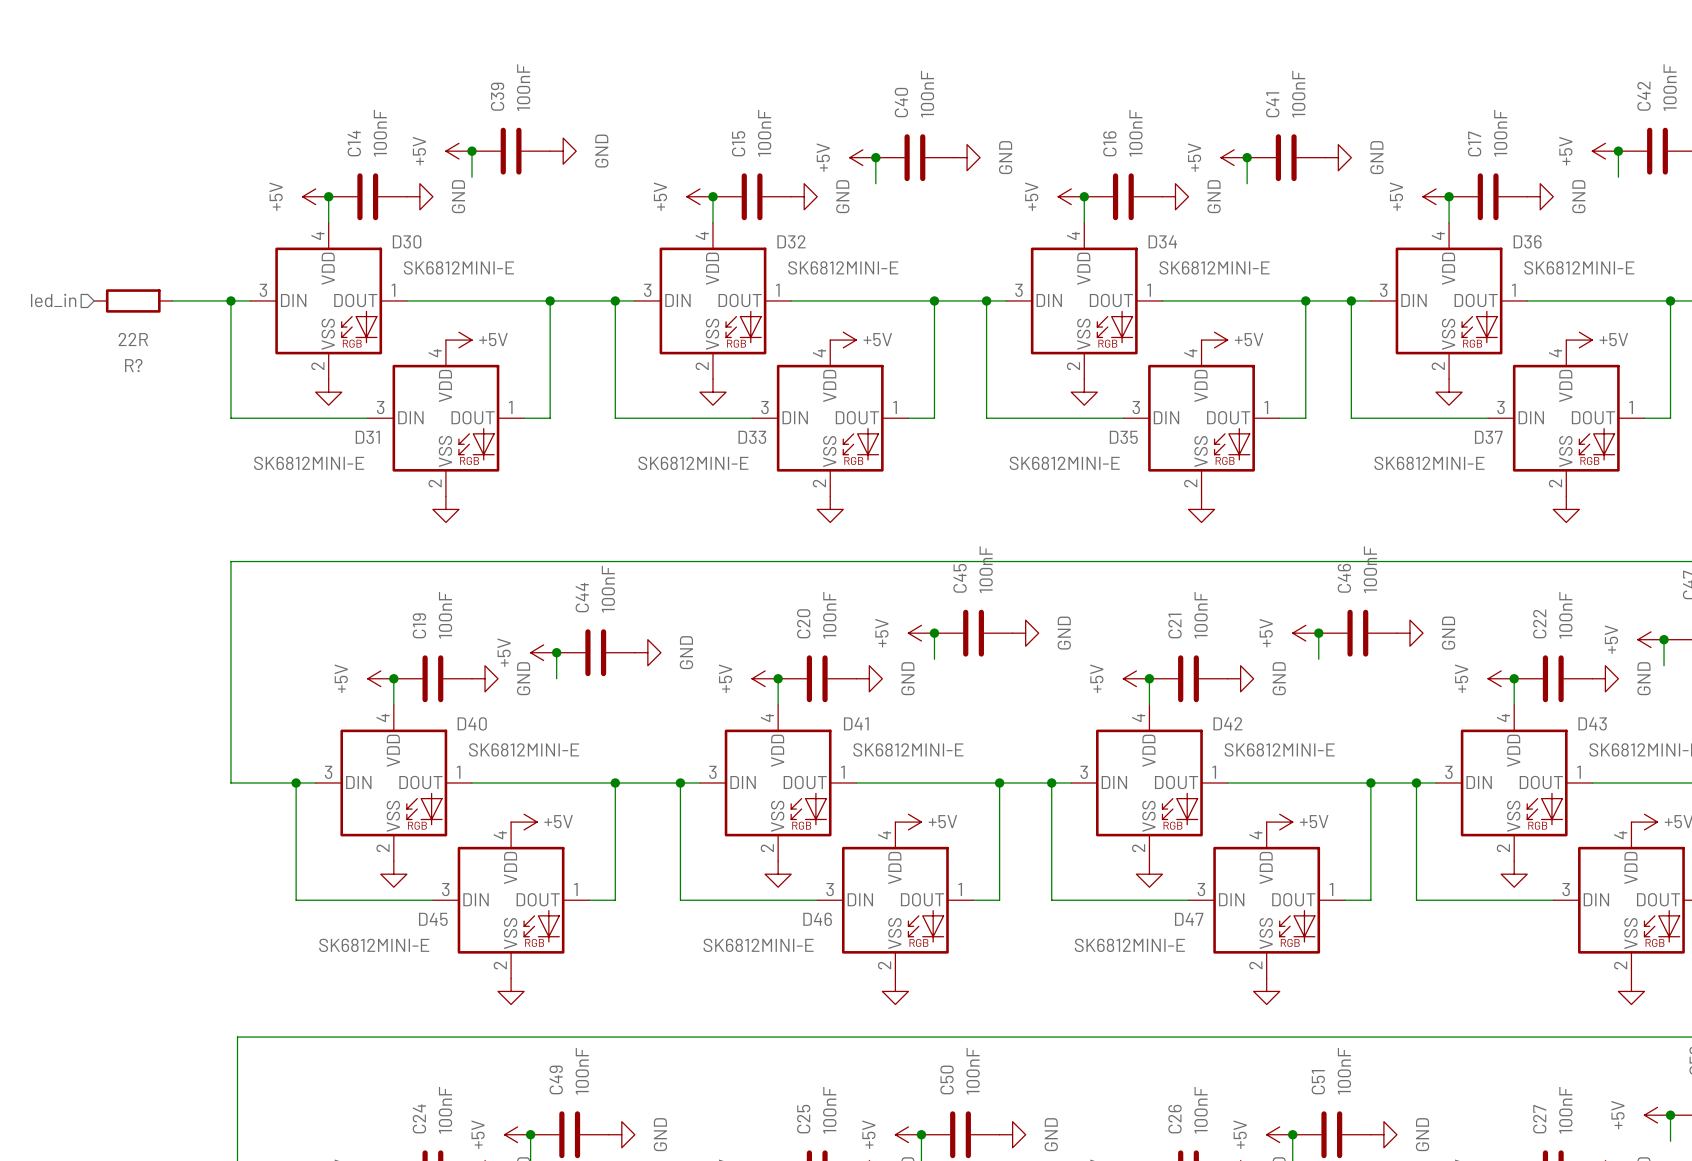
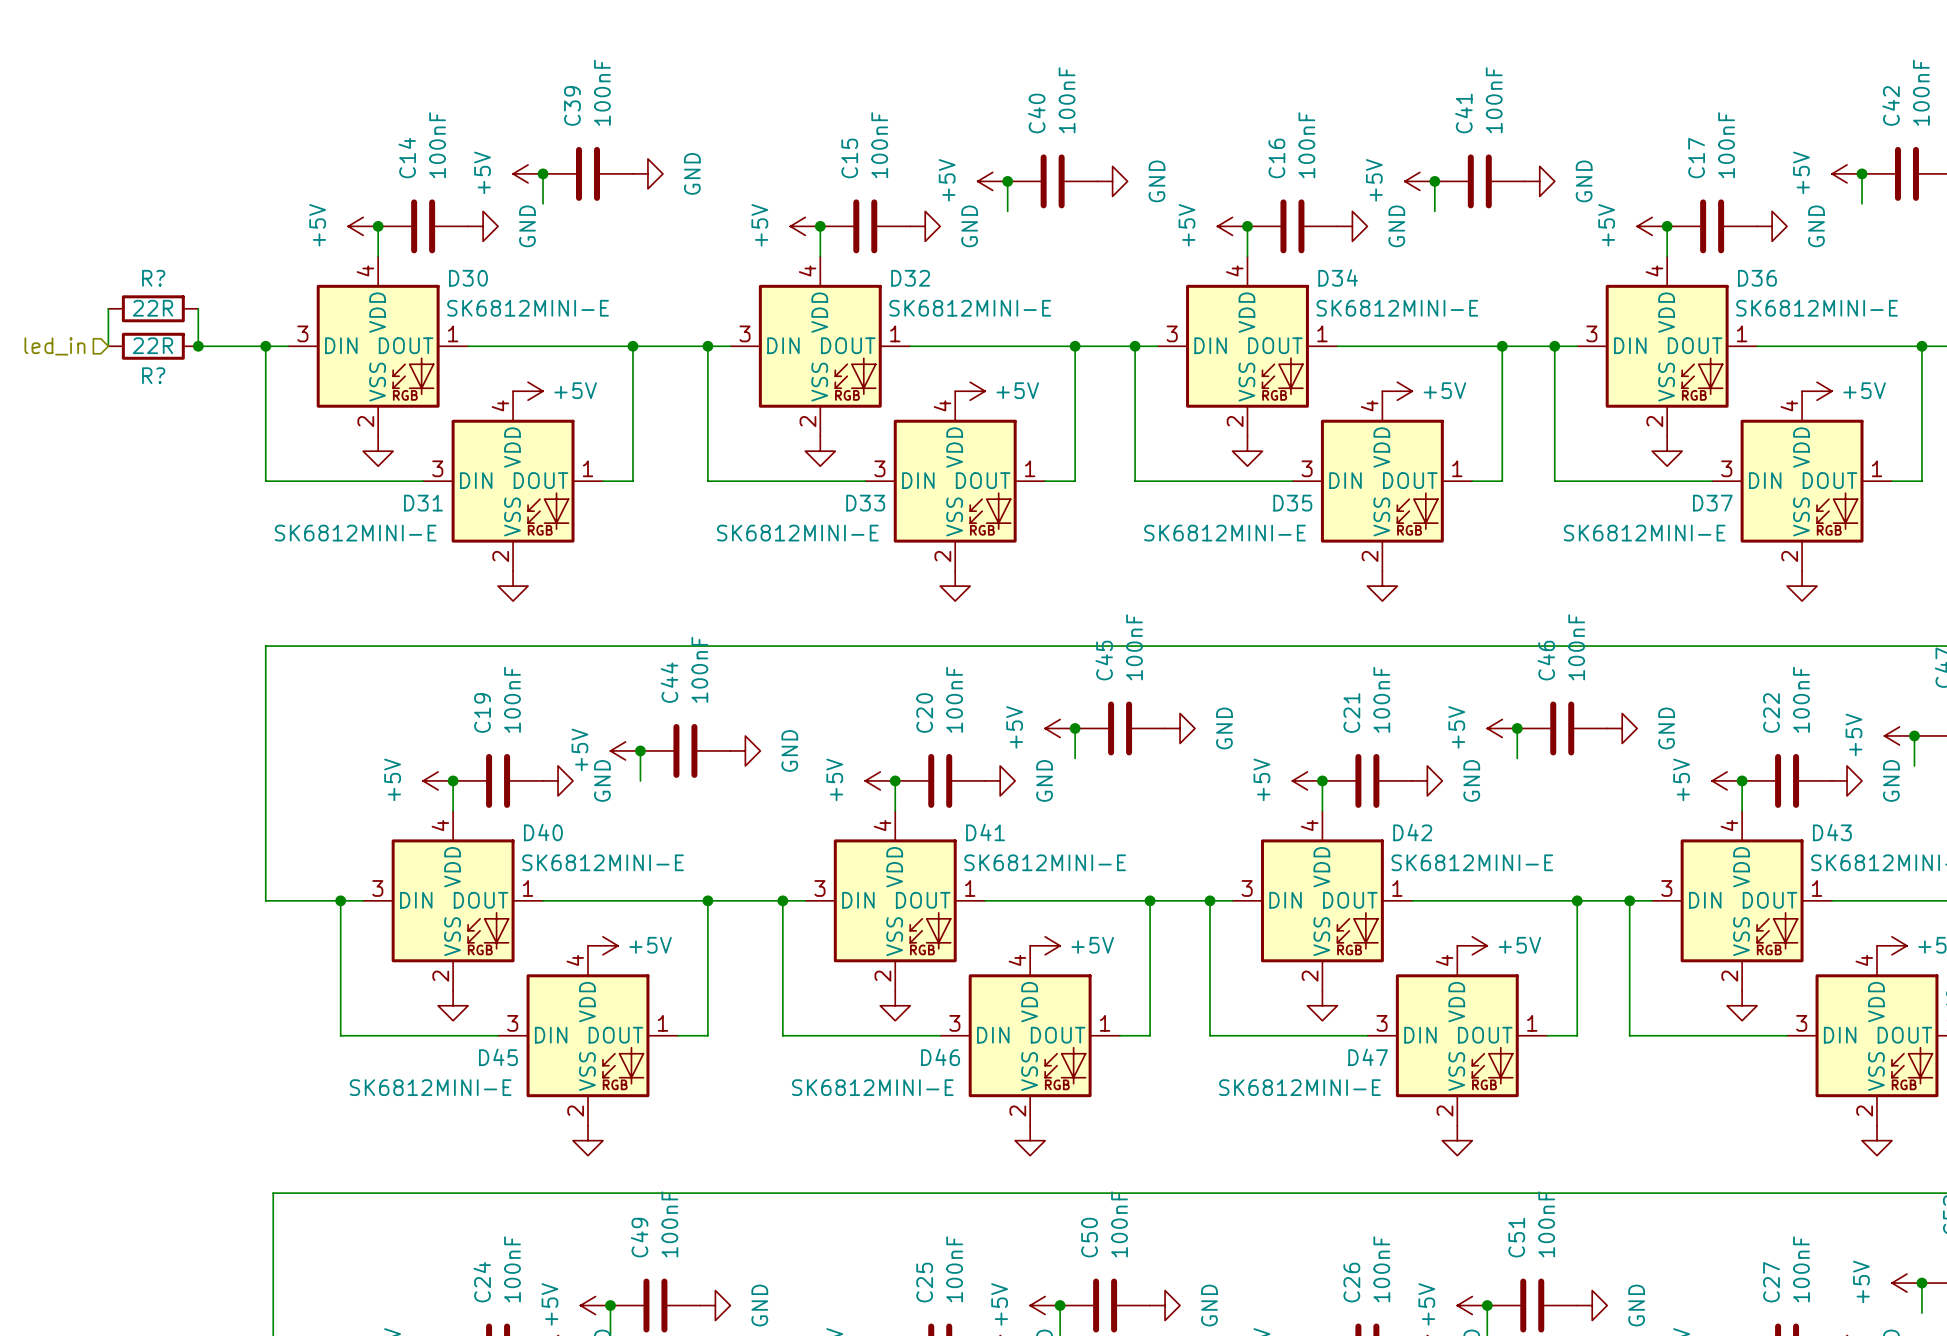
wire: none -> (108, 308) (108, 346)
R?: none -> 22R (153, 308)
wire: none -> (198, 308) (198, 346)
junction: none -> (198, 346)
R? value position: 22R (133, 339) -> 22R (152, 345)
R? name position: R? (133, 365) -> R? (153, 375)

